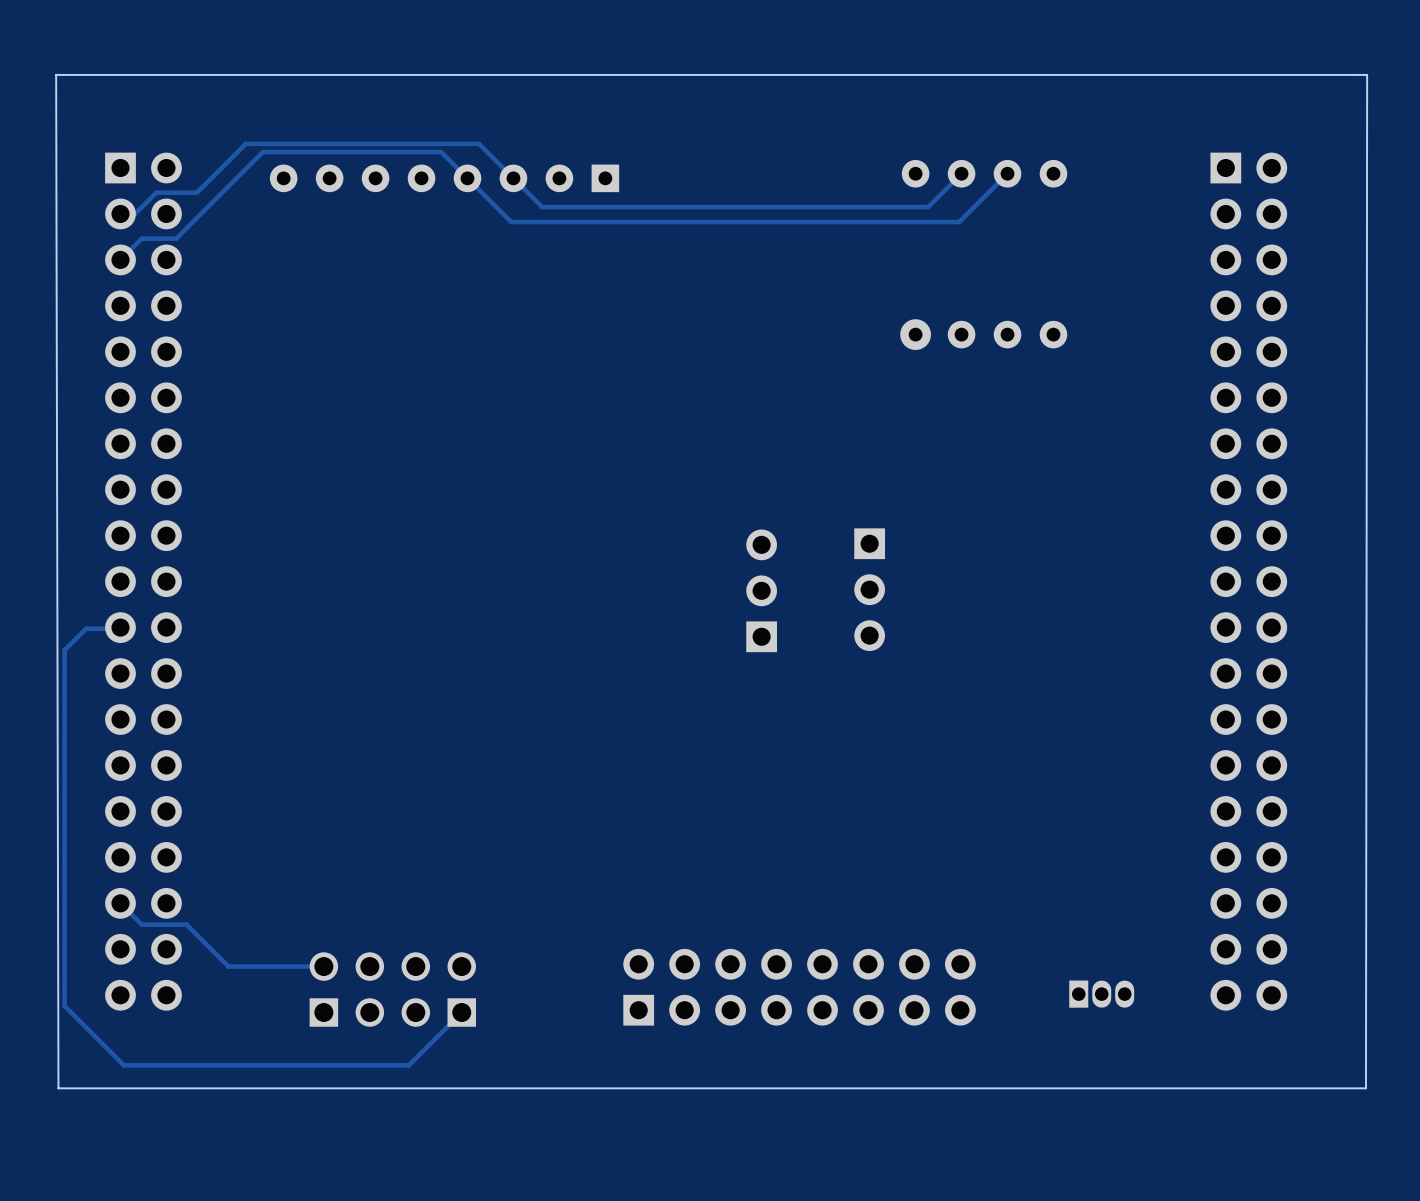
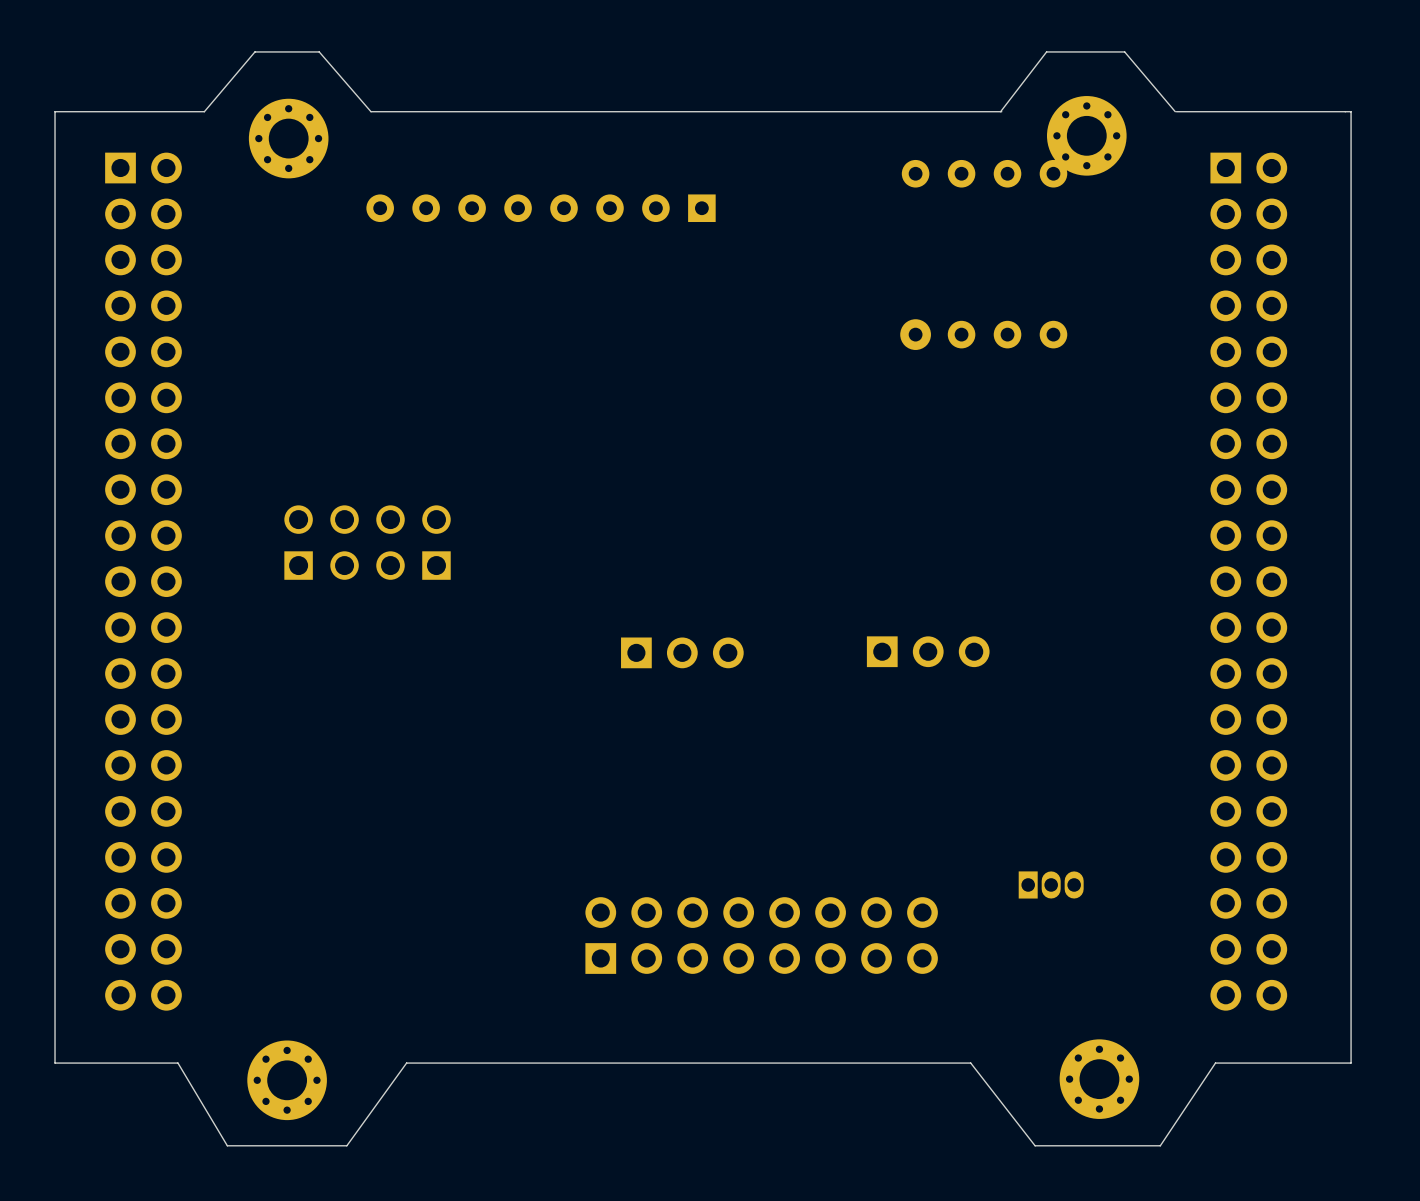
board edge: (1367, 74) (56, 74) (58, 1088) (1366, 1088) (1367, 74) -> none
board edge: none -> (1175, 111) (1124, 51) (1046, 51) (1000, 111)
board edge: none -> (1176, 111) (1351, 111) (1351, 1063) (1215, 1063) (1160, 1145) (1035, 1145) (970, 1063) (406, 1063) (346, 1145) (227, 1145) (177, 1063) (55, 1063) (55, 111) (204, 111) (254, 51) (319, 51) (370, 111) (1001, 111)
part: none -> (1086, 135)
part: none -> (288, 138)
track: (961, 173) (928, 207) (542, 207) (478, 143) (245, 143) (196, 192) (156, 192) (135, 213) (120, 213) -> none
track: (1007, 173) (959, 222) (511, 222) (441, 152) (262, 152) (176, 238) (141, 238) (120, 259) -> none
part position: (444, 178) -> (541, 208)
part rotation: 0° (869, 589) -> 90° counterclockwise (928, 651)
part position: (869, 589) -> (928, 651)
part: (761, 590) -> none
track: (119, 628) (86, 628) (64, 650) (64, 1006) (123, 1065) (408, 1065) (461, 1012) -> none
part: none -> (682, 652)
track: (120, 903) (141, 924) (186, 924) (228, 966) (323, 966) -> none
part position: (799, 987) -> (761, 935)
part position: (392, 989) -> (367, 542)
part position: (1101, 994) -> (1051, 884)
part: none -> (1099, 1079)
part: none -> (287, 1080)

